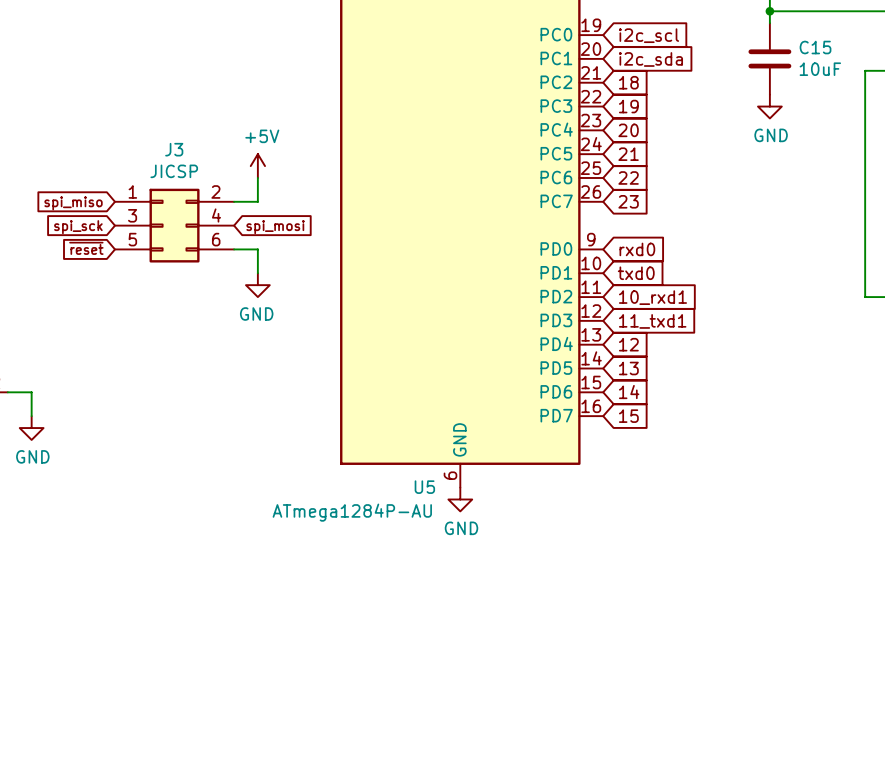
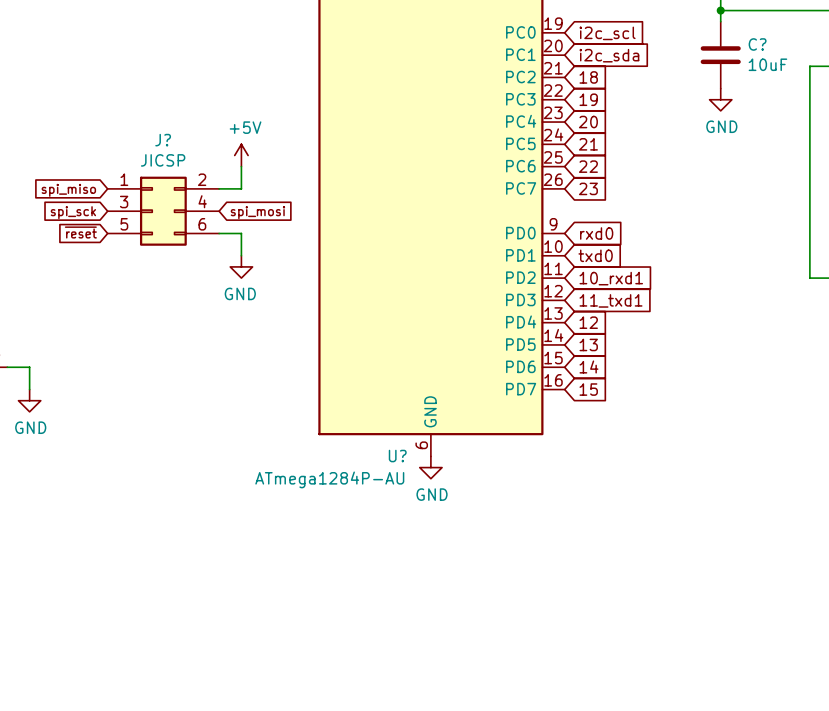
C15 name: C15 (815, 47) -> C? (757, 44)
J3 name: J3 (174, 149) -> J? (163, 140)
U5 name: U5 (424, 487) -> U? (397, 456)

